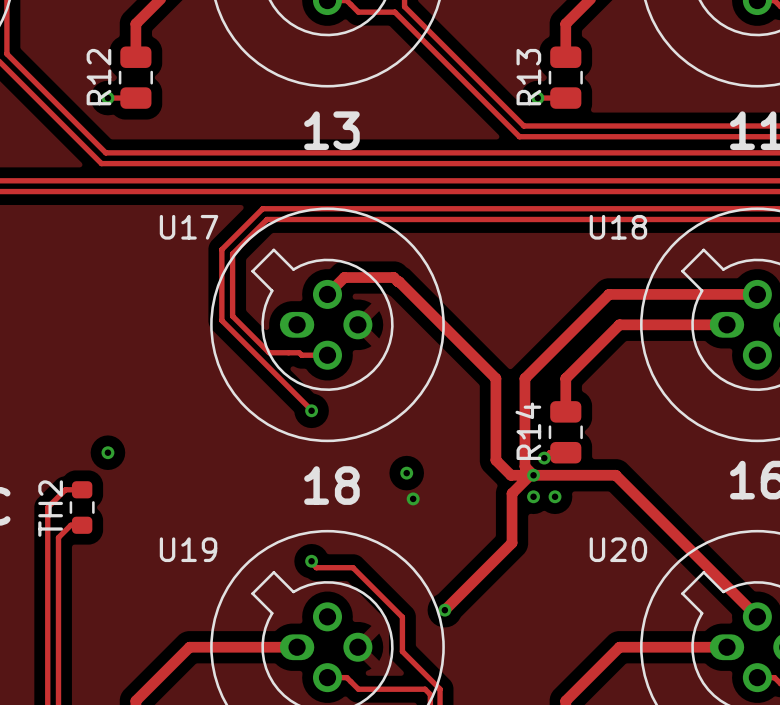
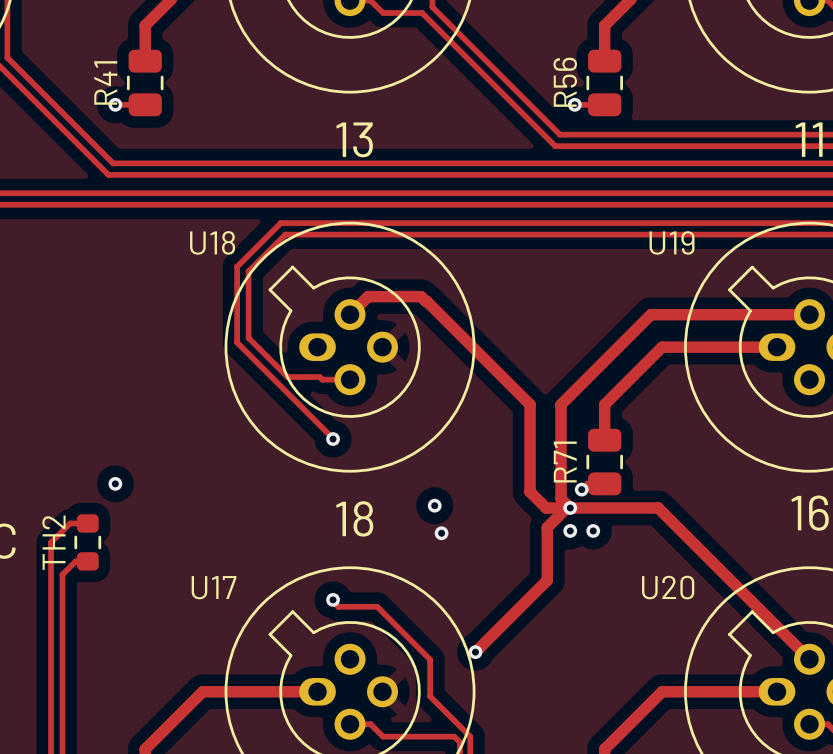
R12 name: R12 (98, 77) -> R41 (105, 82)
R13 name: R13 (528, 77) -> R56 (565, 82)
U17 name: U17 (189, 227) -> U18 (212, 242)
U18 name: U18 (618, 227) -> U19 (672, 242)
R14 name: R14 (528, 431) -> R71 (565, 462)
U19 name: U19 (188, 549) -> U17 (214, 587)

